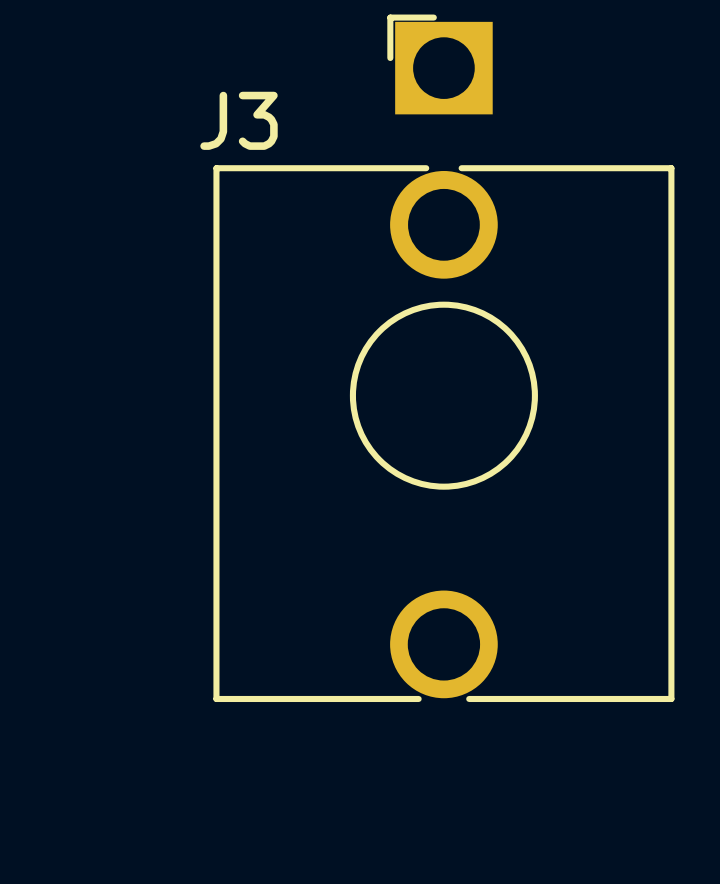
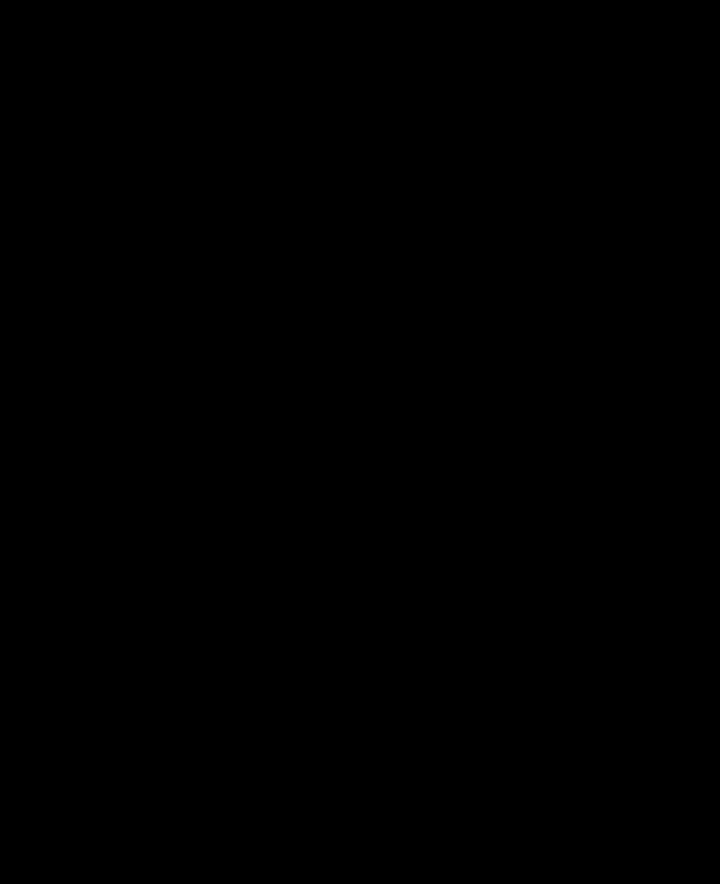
J3: (443, 358) -> none

